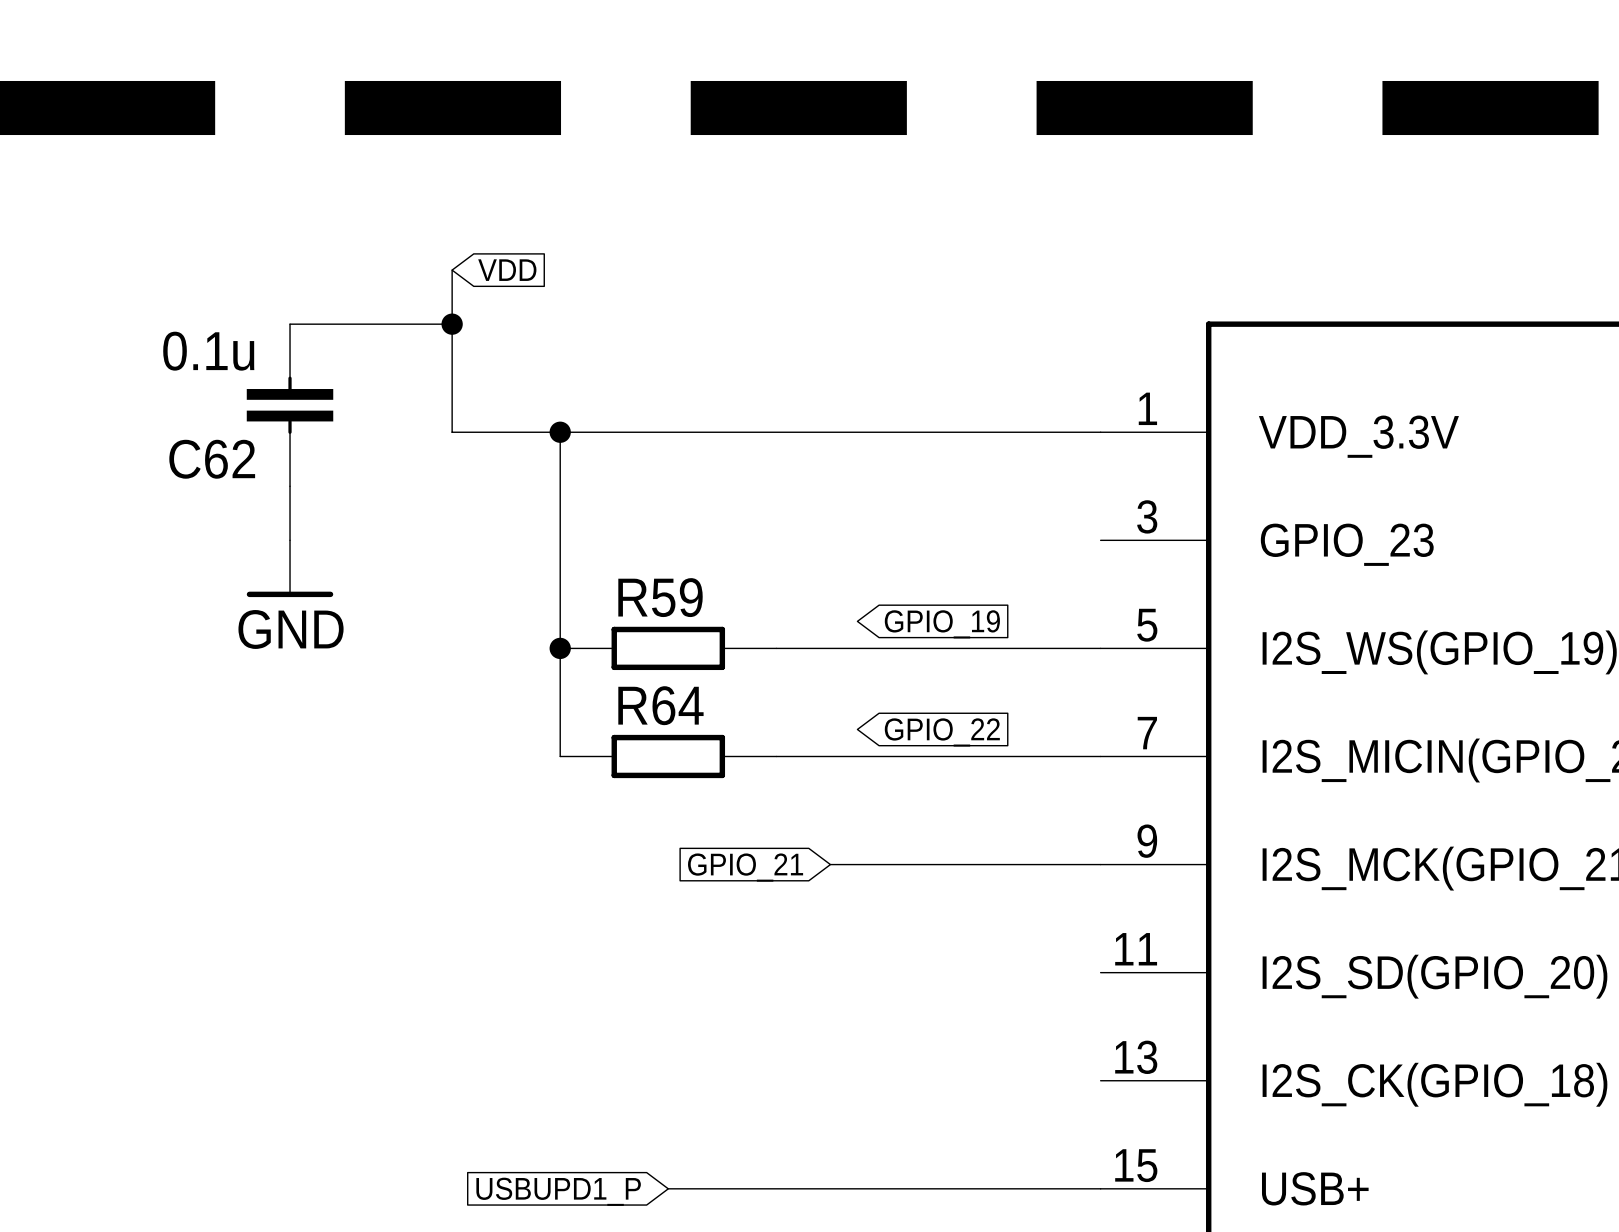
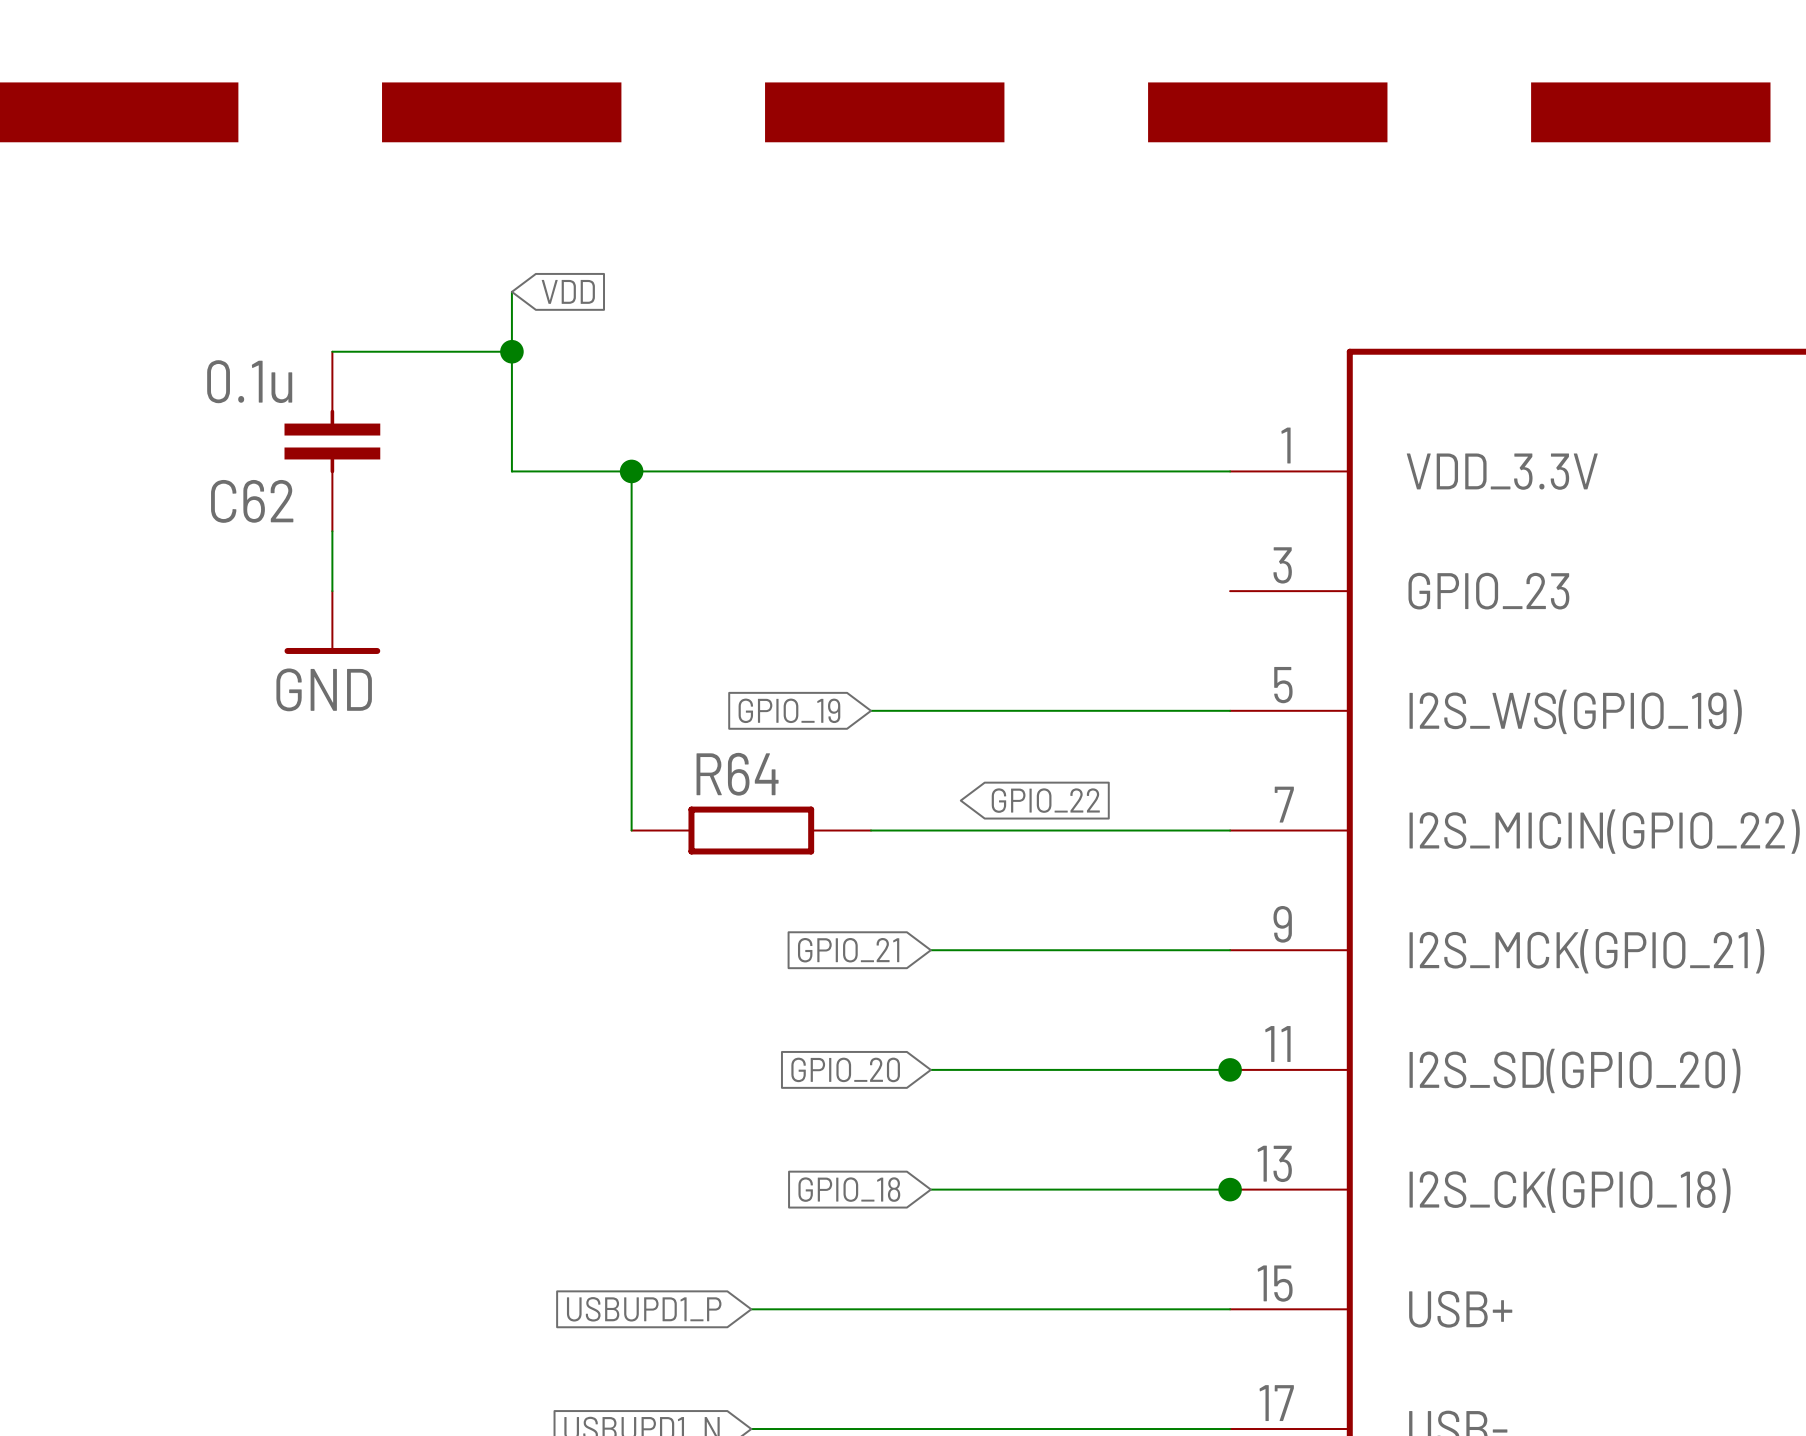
global label rotation: 0° (942, 624) -> 180° (789, 710)
global label position: GPIO_19 (942, 624) -> GPIO_19 (789, 710)
junction: (560, 648) -> none
R59: (668, 648) -> none
wire: none -> (930, 1069) (1230, 1069)
junction: none -> (1230, 1069)
global label: none -> GPIO_20 (845, 1069)
wire: none -> (930, 1189) (1230, 1189)
junction: none -> (1230, 1189)
global label: none -> GPIO_18 (849, 1189)

